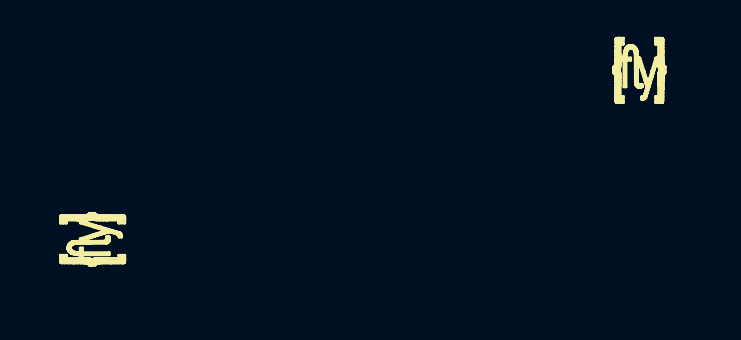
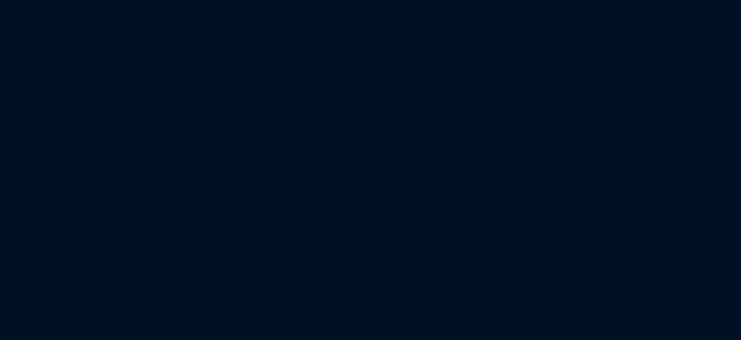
drawing: [612, 36, 667, 104] -> none
drawing: [59, 211, 127, 267] -> none

